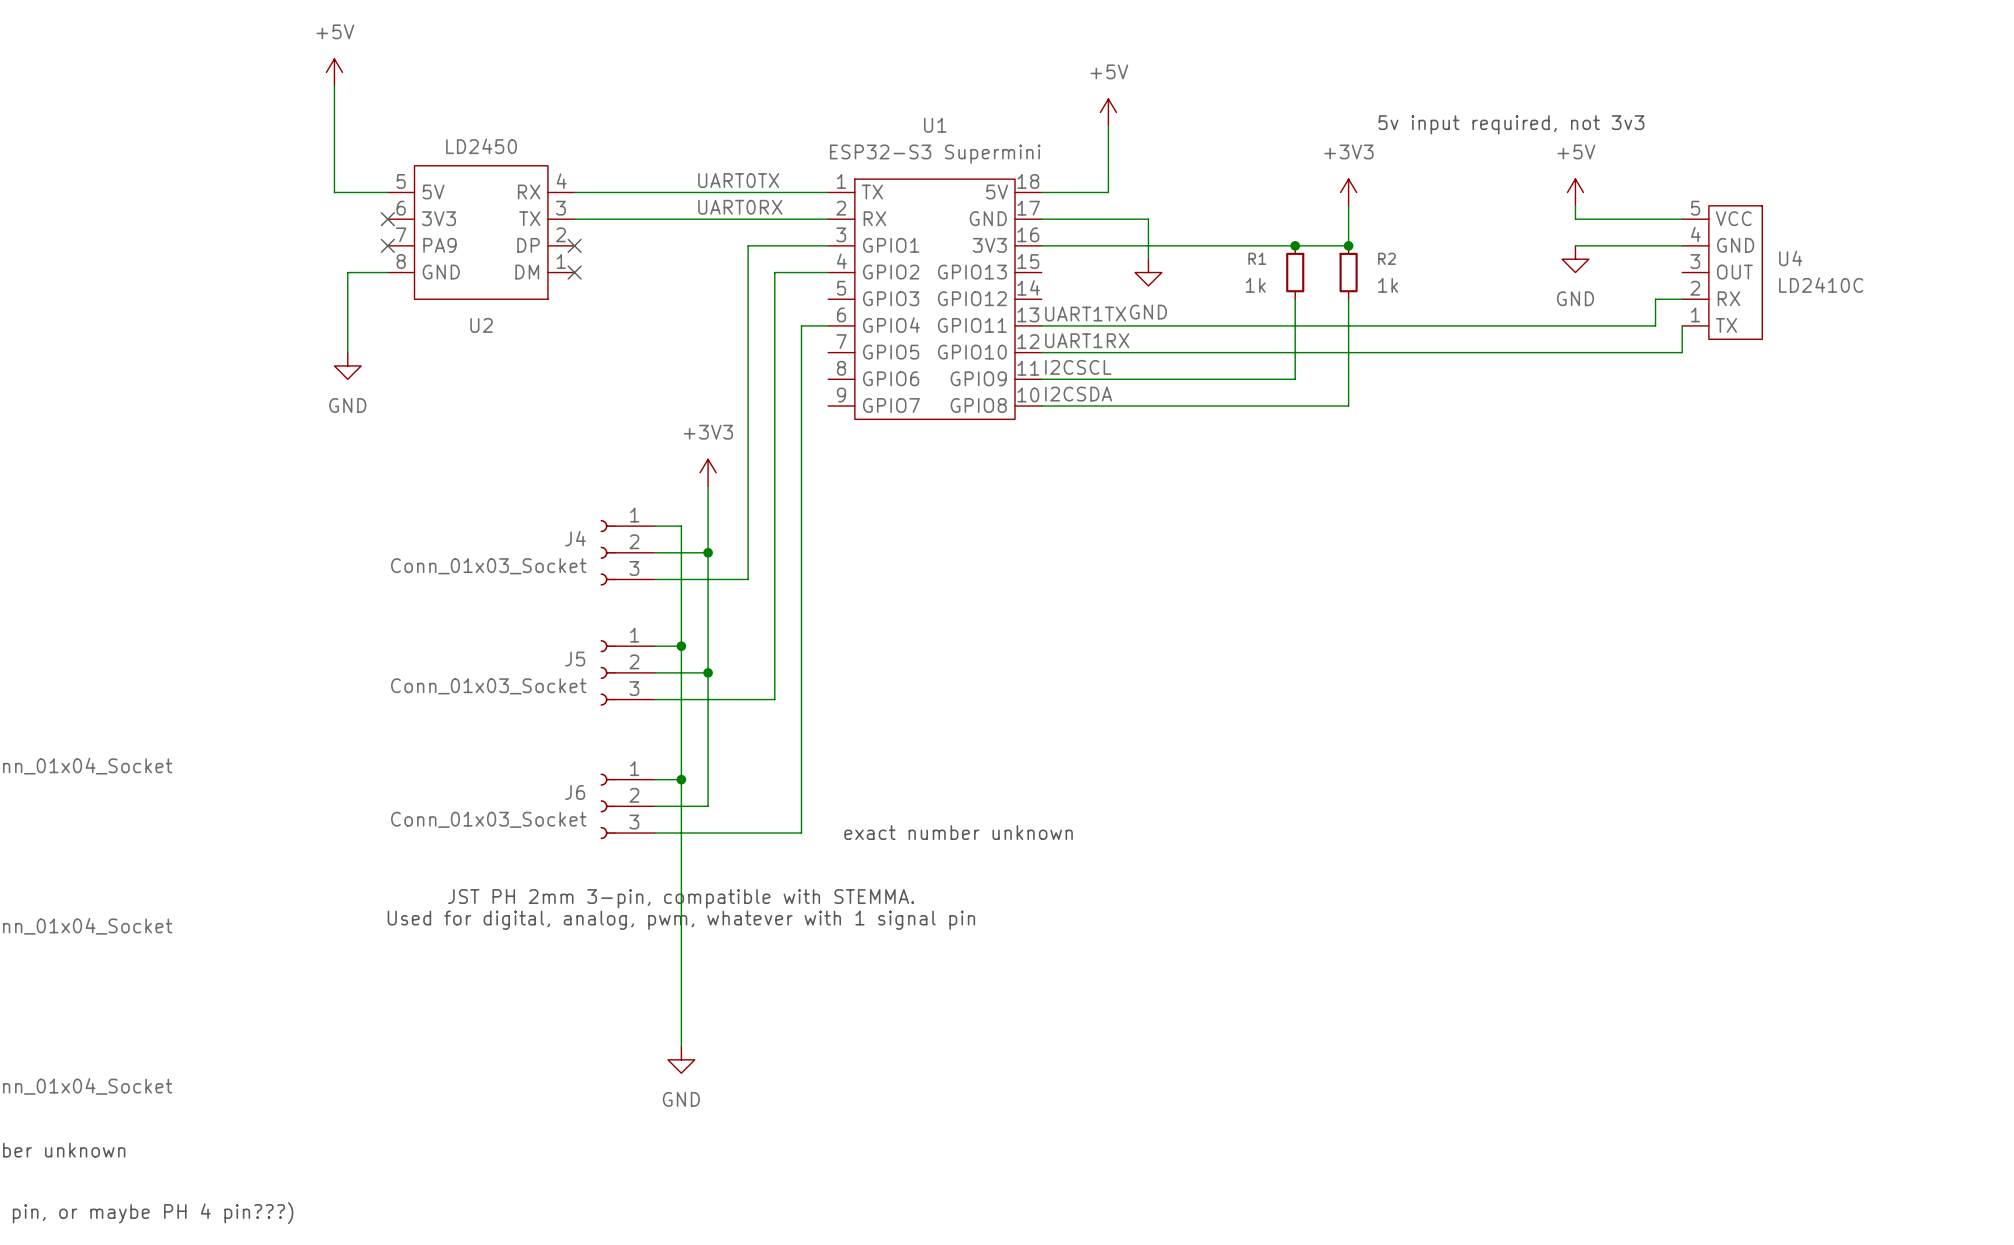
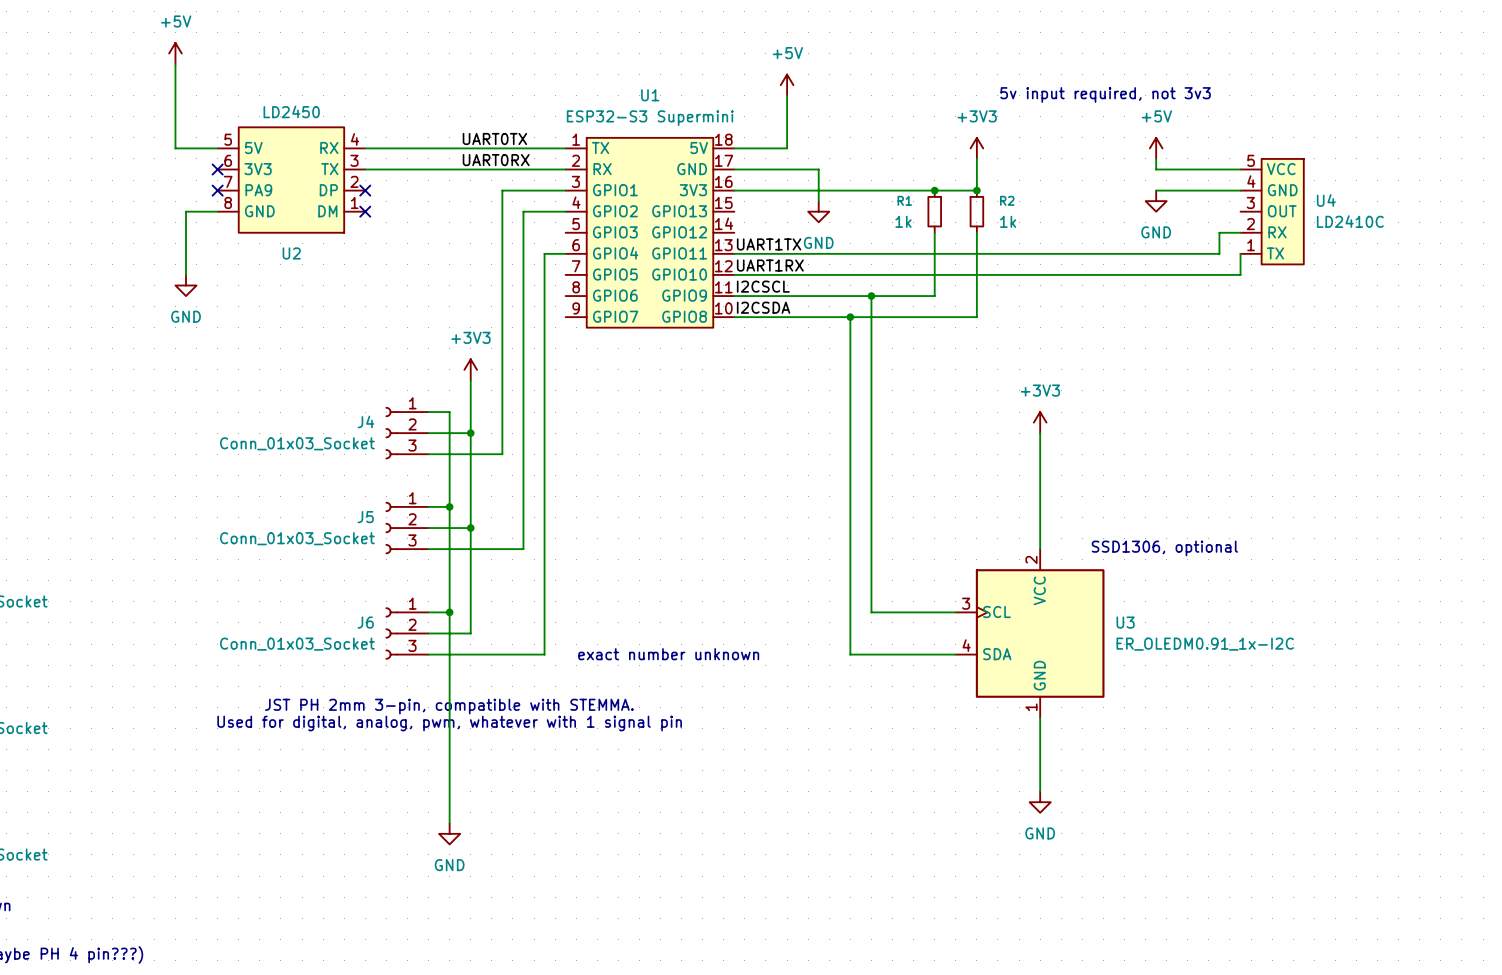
wire: none -> (871, 296) (871, 612) (955, 612)
junction: none -> (871, 296)
wire: none -> (850, 317) (850, 654) (955, 654)
junction: none -> (850, 317)
power symbol: none -> +3V3 (1040, 422)
wire: none -> (1040, 433) (1040, 549)
text: none -> SSD1306, optional (1164, 548)
U3: none -> ER_OLEDM0.91_1x-I2C (1030, 633)
wire: none -> (1040, 717) (1040, 791)
power symbol: none -> GND (1040, 802)

